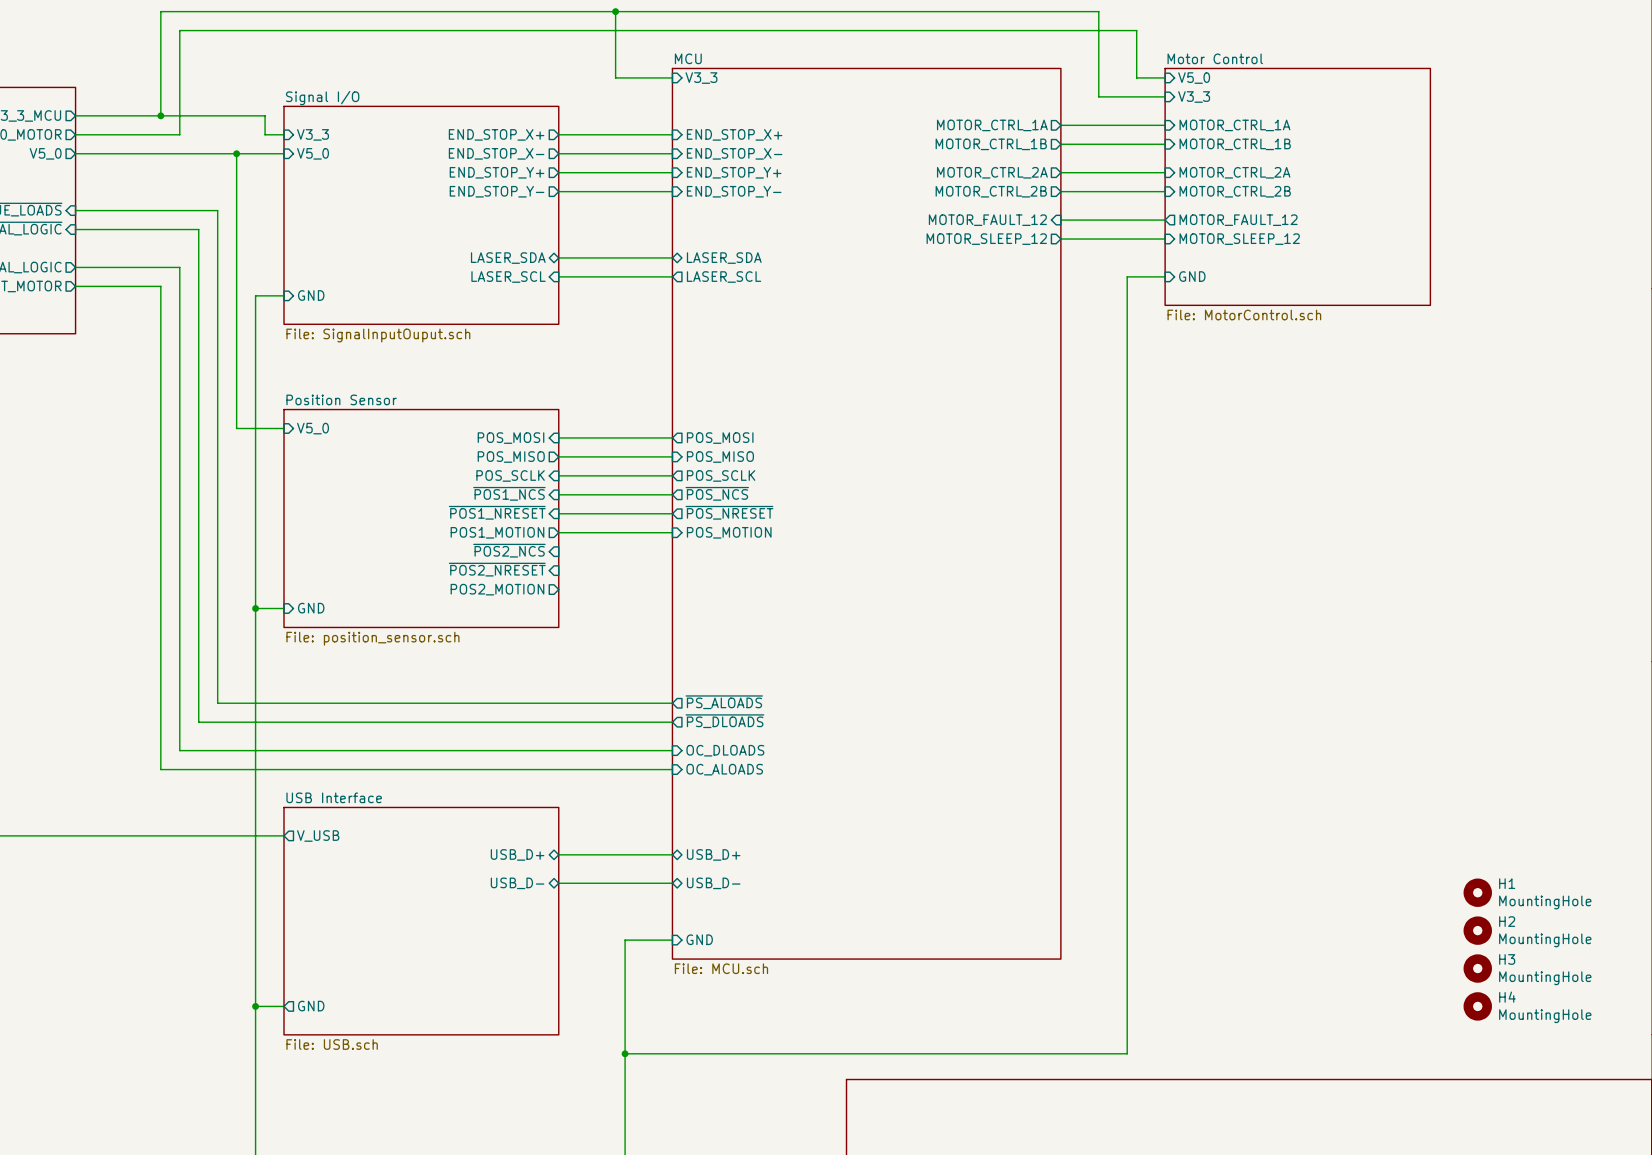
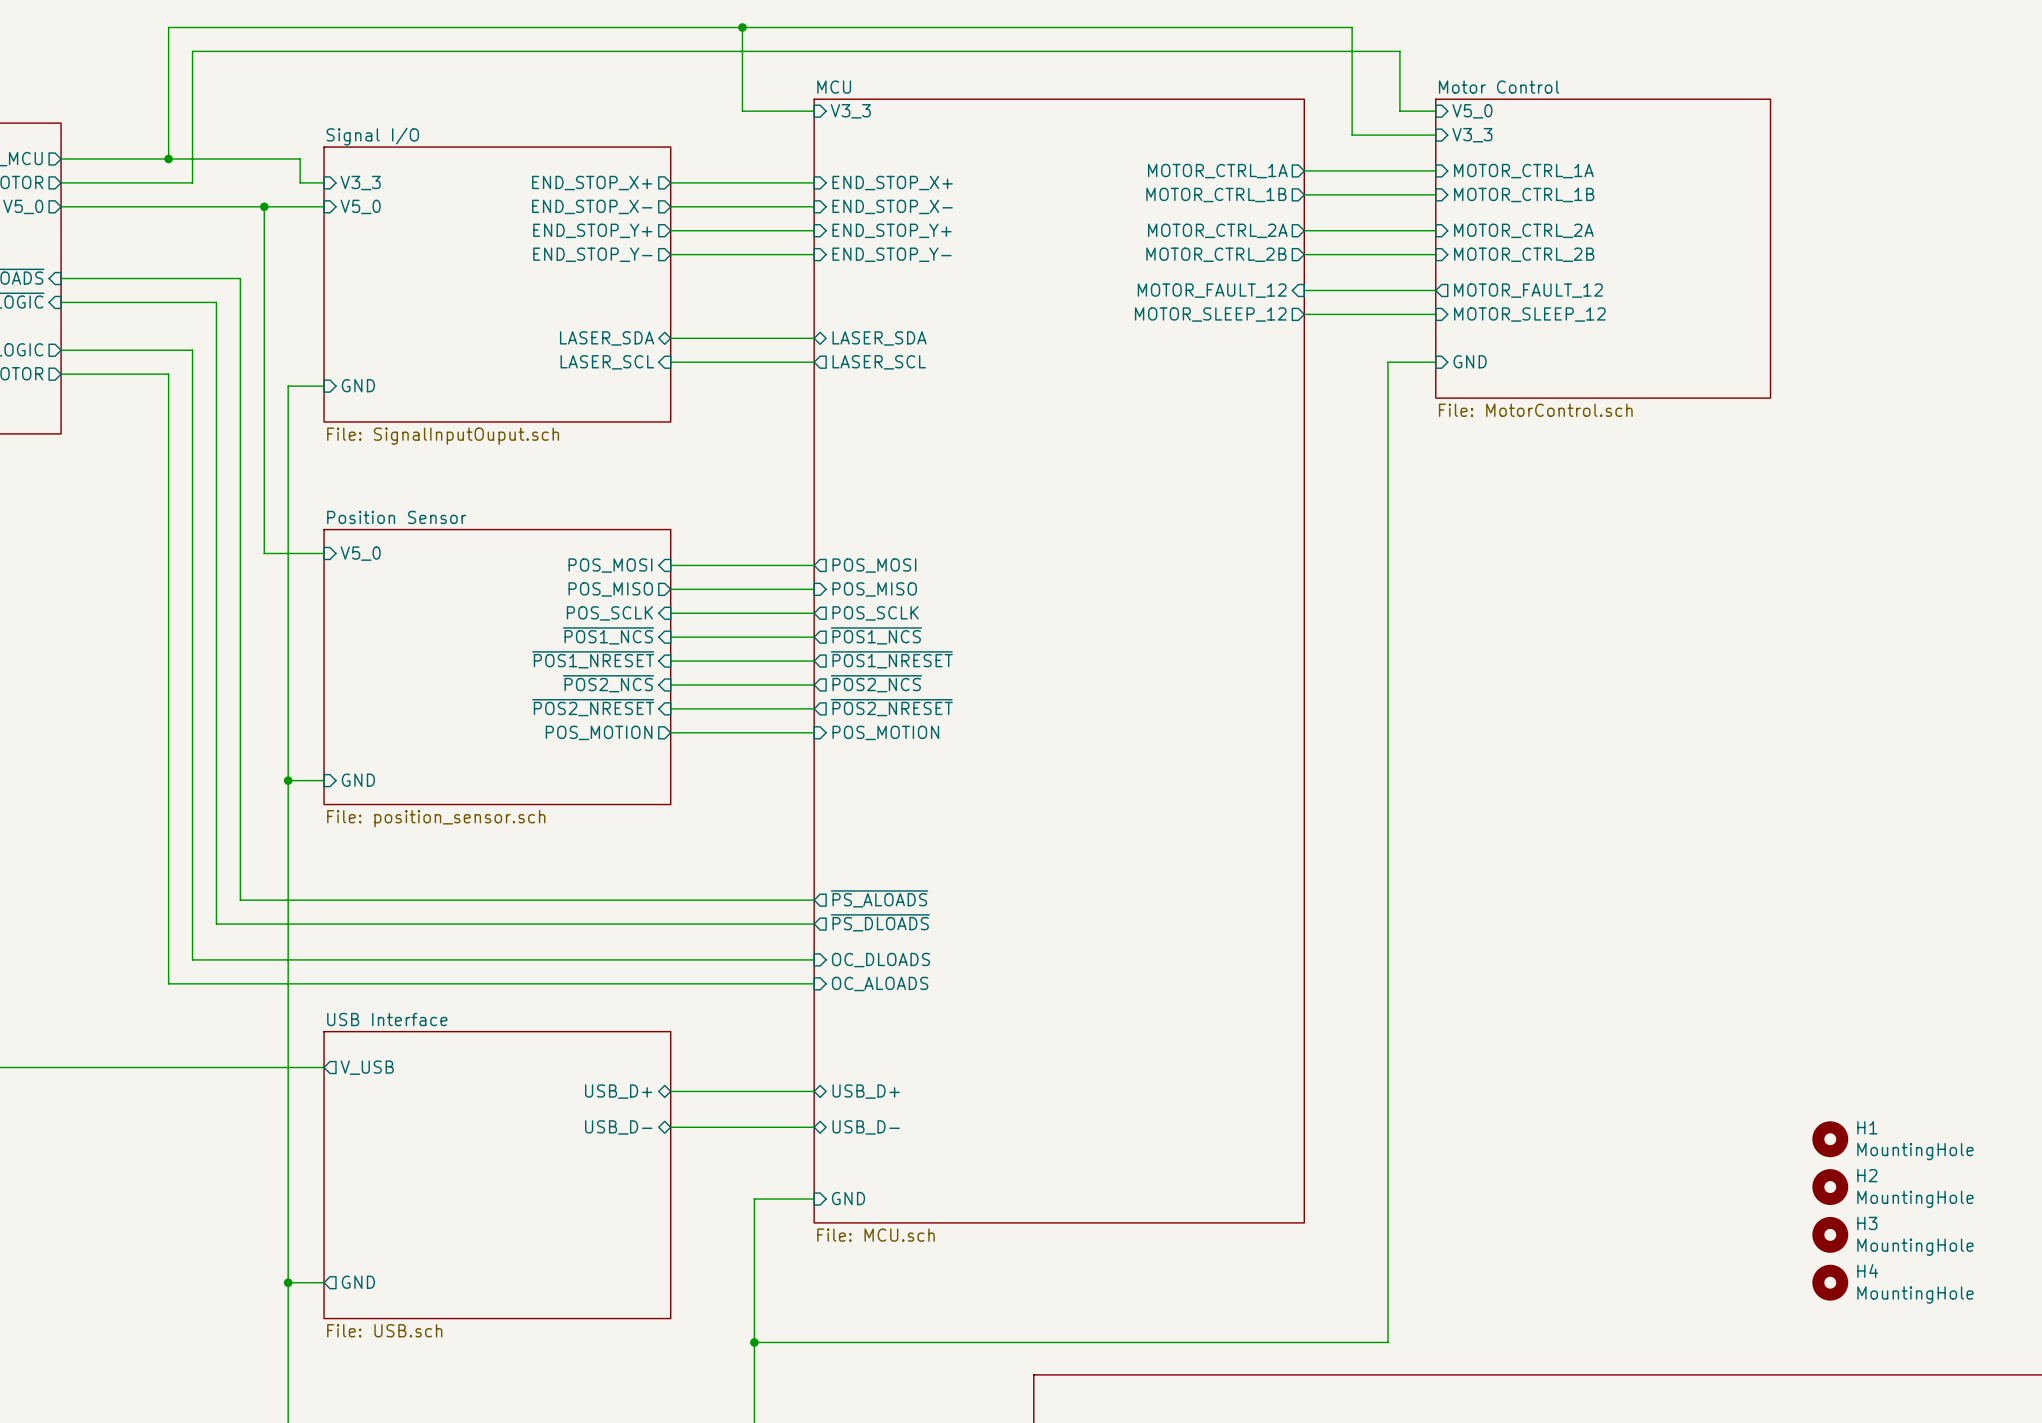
sheet pin: ~{POS_NCS} (717, 493) -> ~{POS1_NCS} (876, 635)
sheet pin: ~{POS_NRESET} (729, 512) -> ~{POS1_NRESET} (891, 659)
sheet pin shape: output (497, 532) -> input (608, 683)
sheet pin: POS1_MOTION (497, 532) -> ~{POS2_NCS} (608, 683)
sheet pin shape: input (729, 532) -> output (876, 683)
sheet pin: POS_MOTION (729, 532) -> ~{POS2_NCS} (876, 683)
sheet pin: ~{POS2_NCS} (509, 550) -> ~{POS2_NRESET} (593, 707)
sheet pin: none -> ~{POS2_NRESET} (891, 707)
wire: none -> (670, 708) (814, 708)
sheet pin shape: input (497, 569) -> output (599, 732)
sheet pin: ~{POS2_NRESET} (497, 569) -> POS_MOTION (599, 732)
wire: none -> (670, 732) (814, 732)
sheet pin: none -> POS_MOTION (885, 732)
sheet pin: POS2_MOTION (497, 589) -> none

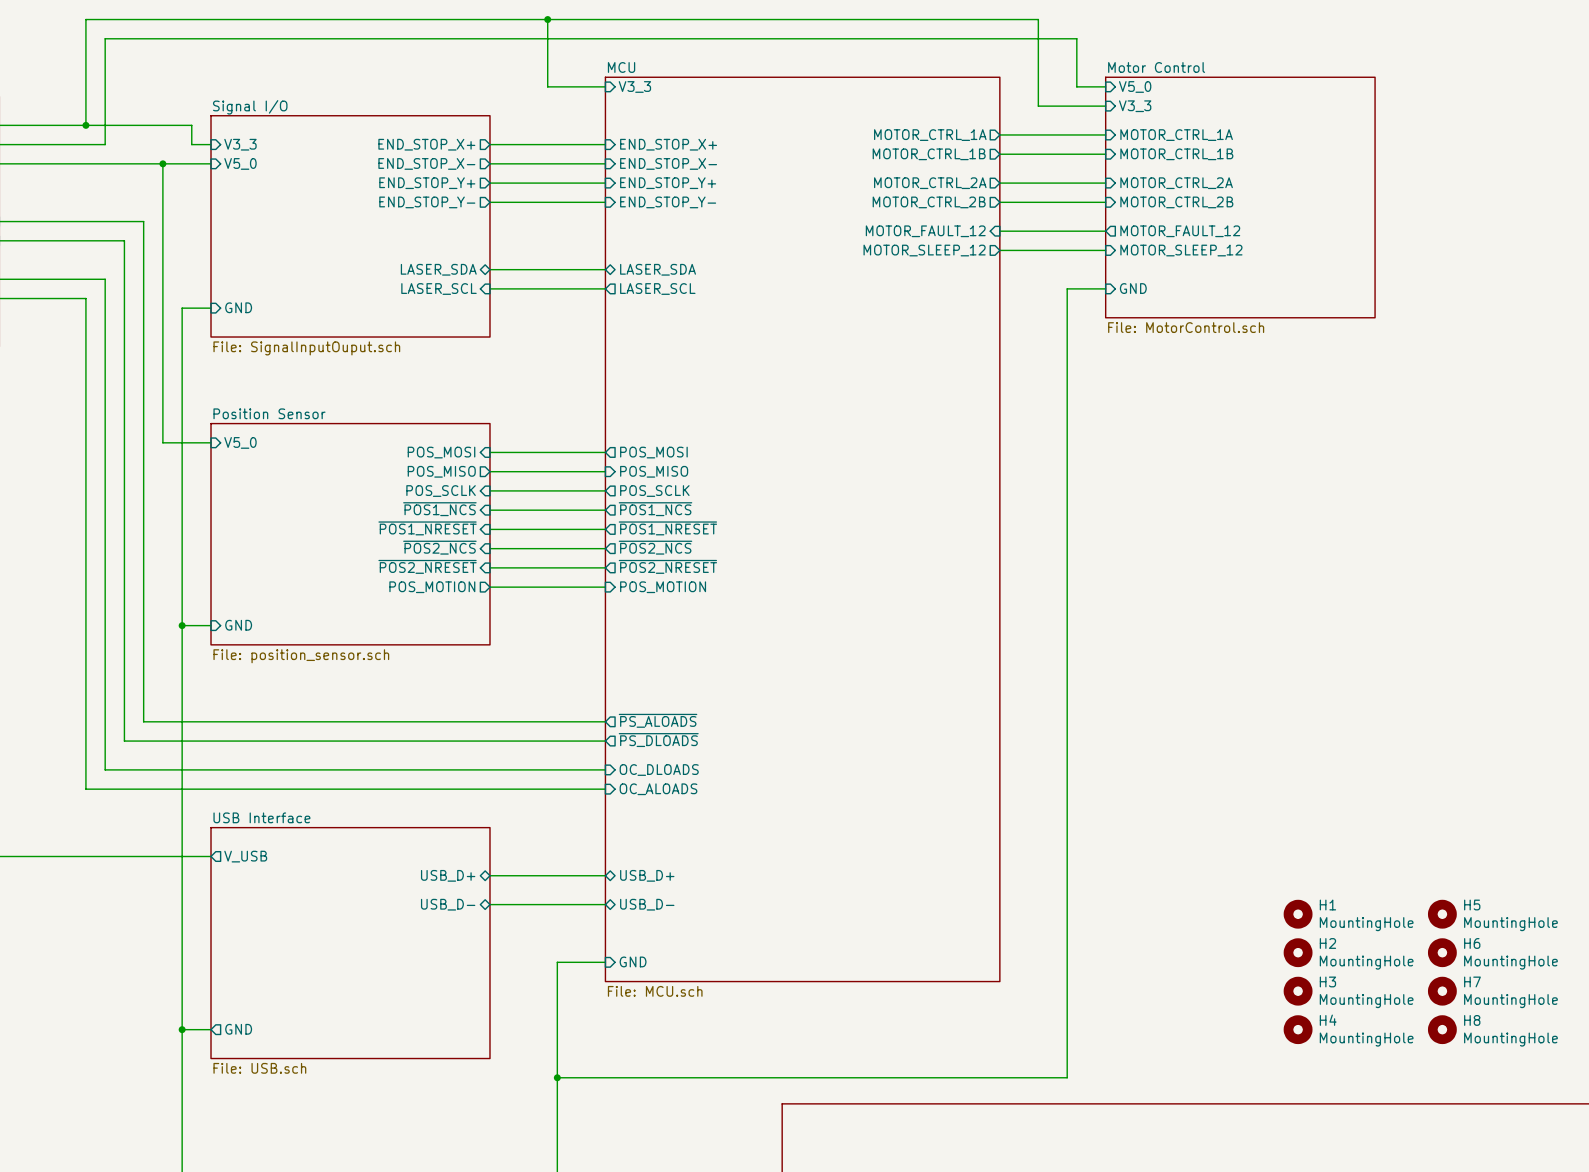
H1 position: (1830, 1139) -> (1298, 914)
H5: none -> MountingHole (1442, 914)
H2 position: (1830, 1187) -> (1298, 952)
H6: none -> MountingHole (1442, 952)
H3 position: (1830, 1234) -> (1298, 991)
H7: none -> MountingHole (1442, 991)
H4 position: (1830, 1282) -> (1298, 1029)
H8: none -> MountingHole (1442, 1029)

